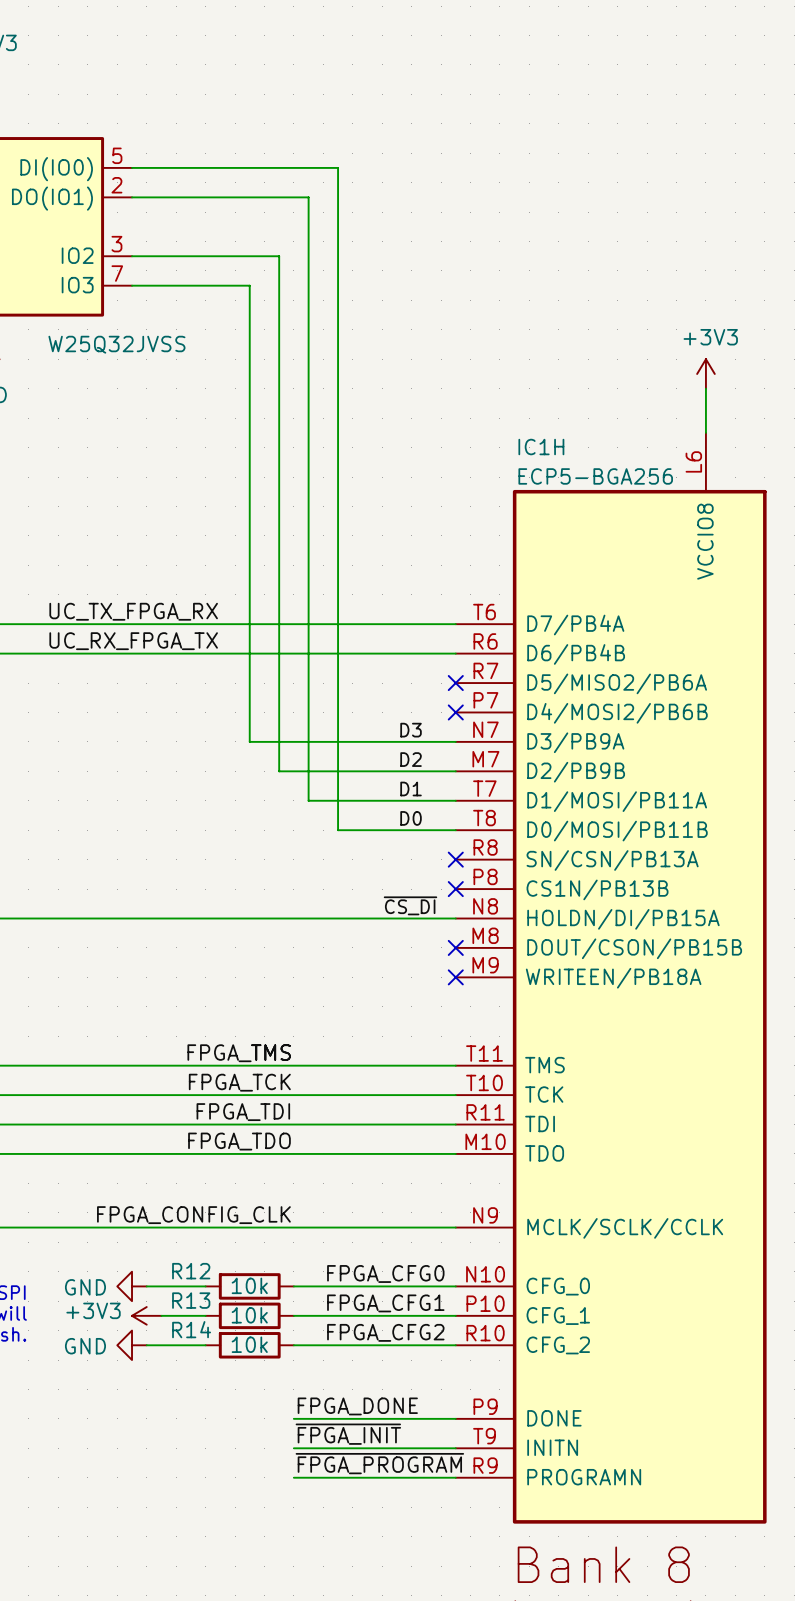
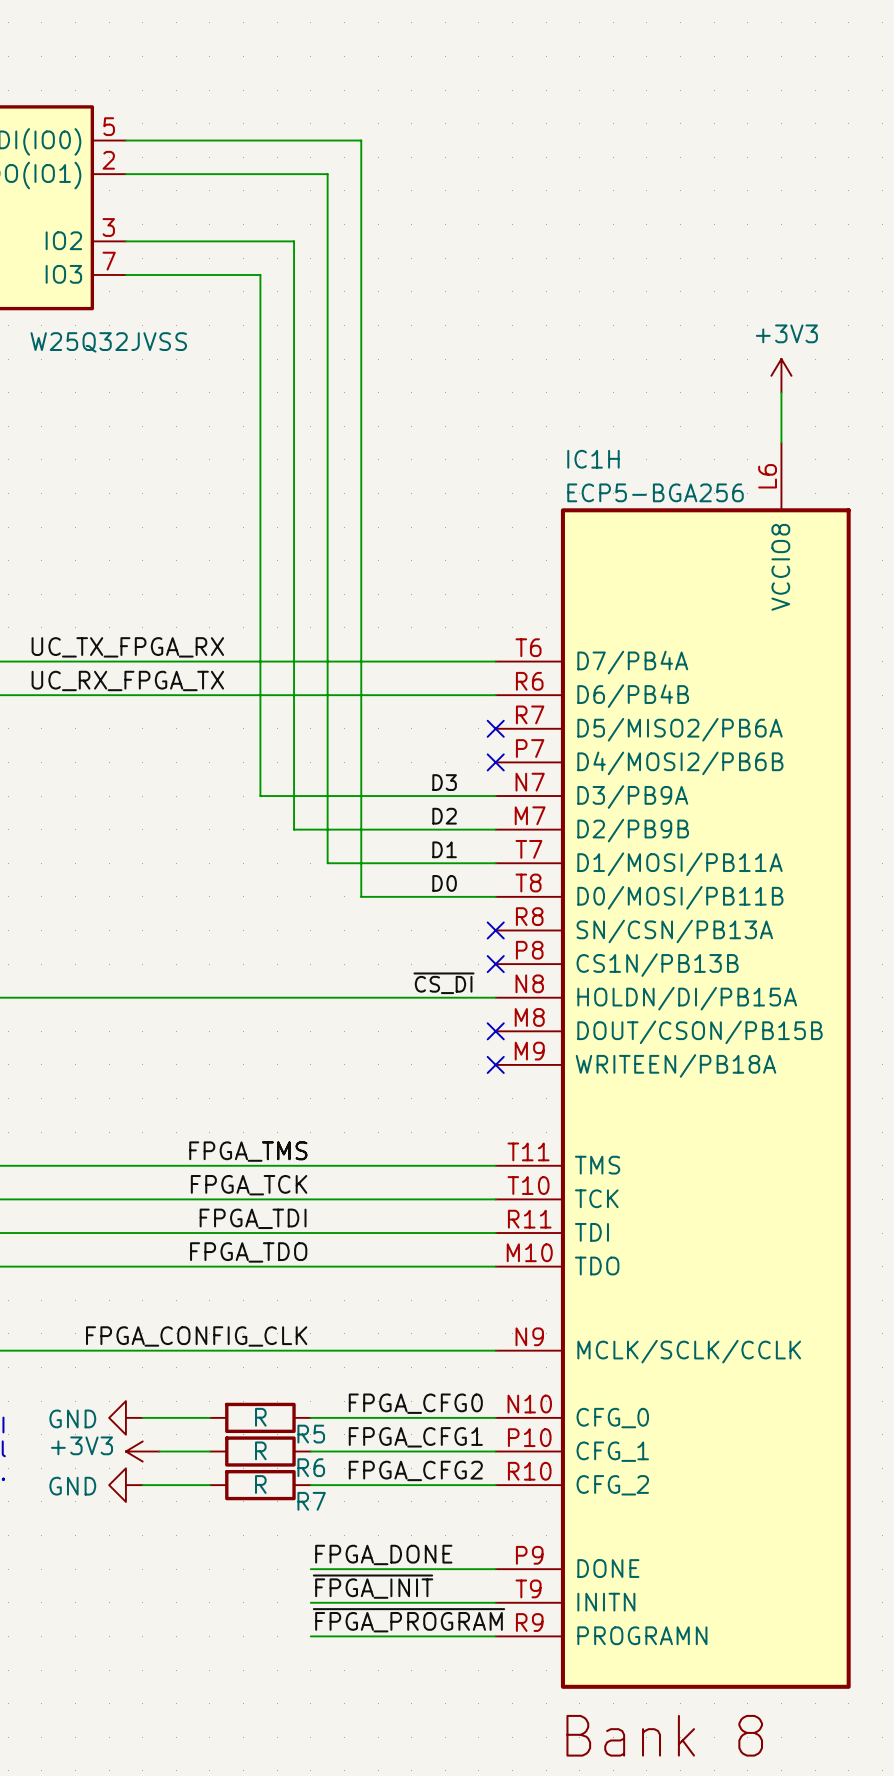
R12 name: R12 (191, 1271) -> R5 (311, 1434)
R12 value: 10k (249, 1285) -> R (260, 1417)
R13 name: R13 (191, 1300) -> R6 (311, 1467)
R13 value: 10k (249, 1315) -> R (260, 1450)
R14 name: R14 (191, 1329) -> R7 (311, 1501)
R14 value: 10k (249, 1344) -> R (260, 1484)

